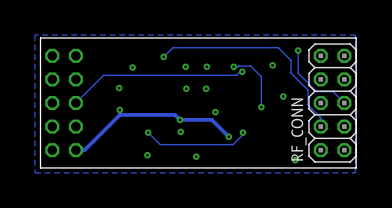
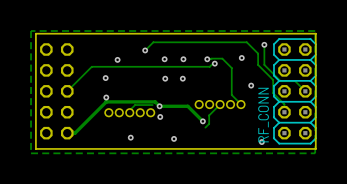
track: none -> (231, 95) (240, 104)
via: (261, 107) -> none
via: (215, 112) -> none
track: none -> (220, 104) (209, 115)
part: none -> (220, 104)
track: none -> (152, 105) (135, 105) (129, 110)
part: none -> (129, 112)
track: none -> (209, 115) (209, 123) (205, 127)
via: (148, 132) -> none
track: (242, 132) (233, 144) (160, 144) (148, 132) -> none
via: (242, 132) -> none

